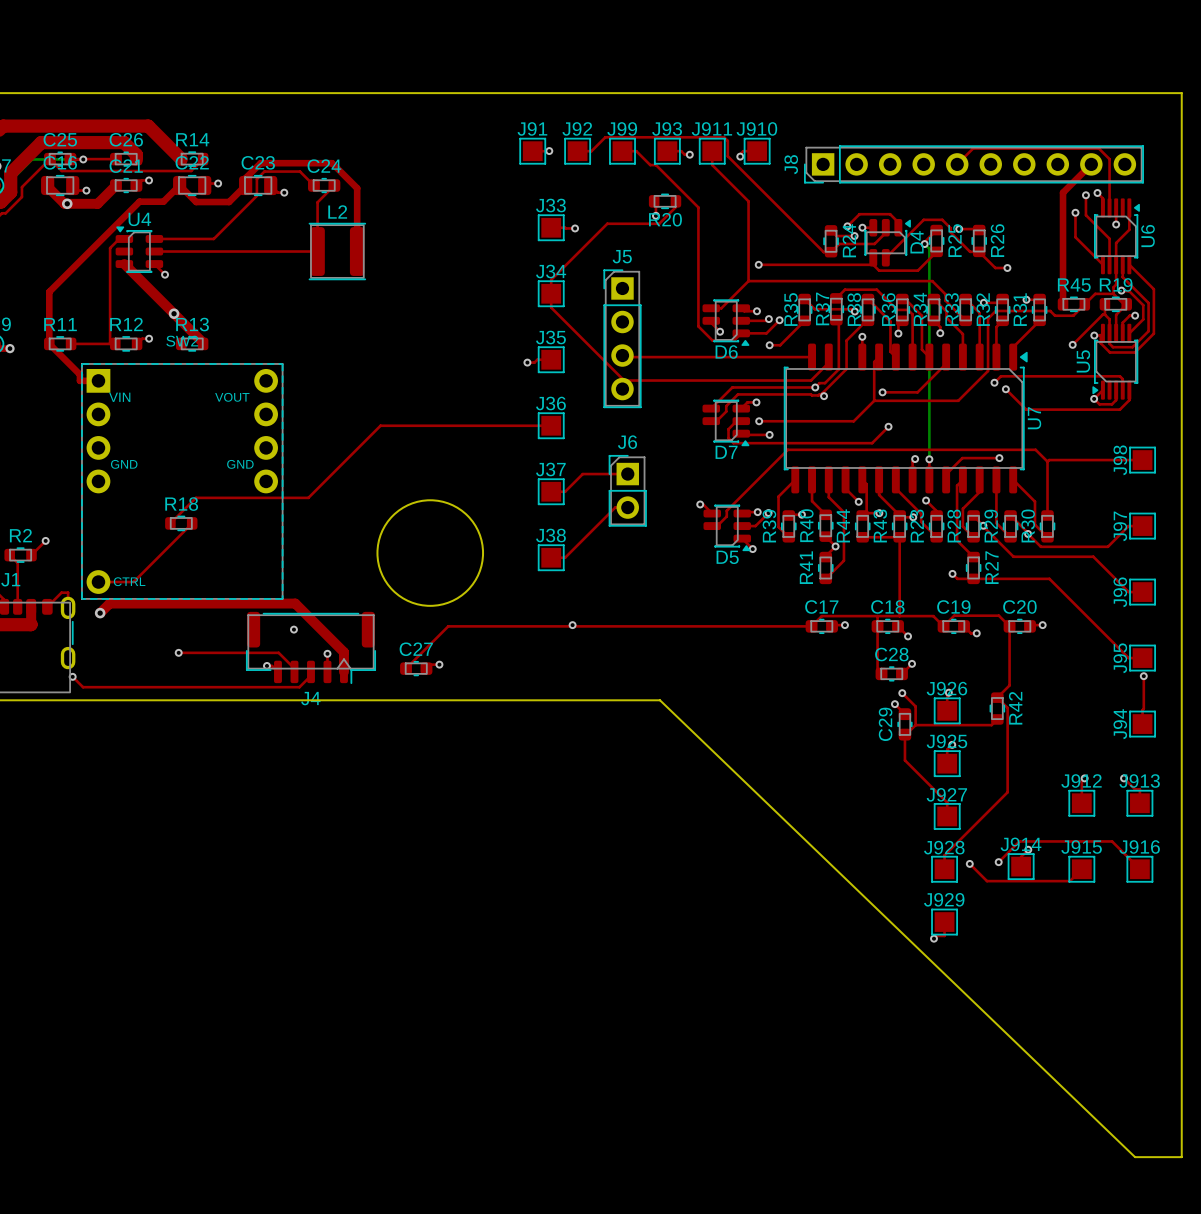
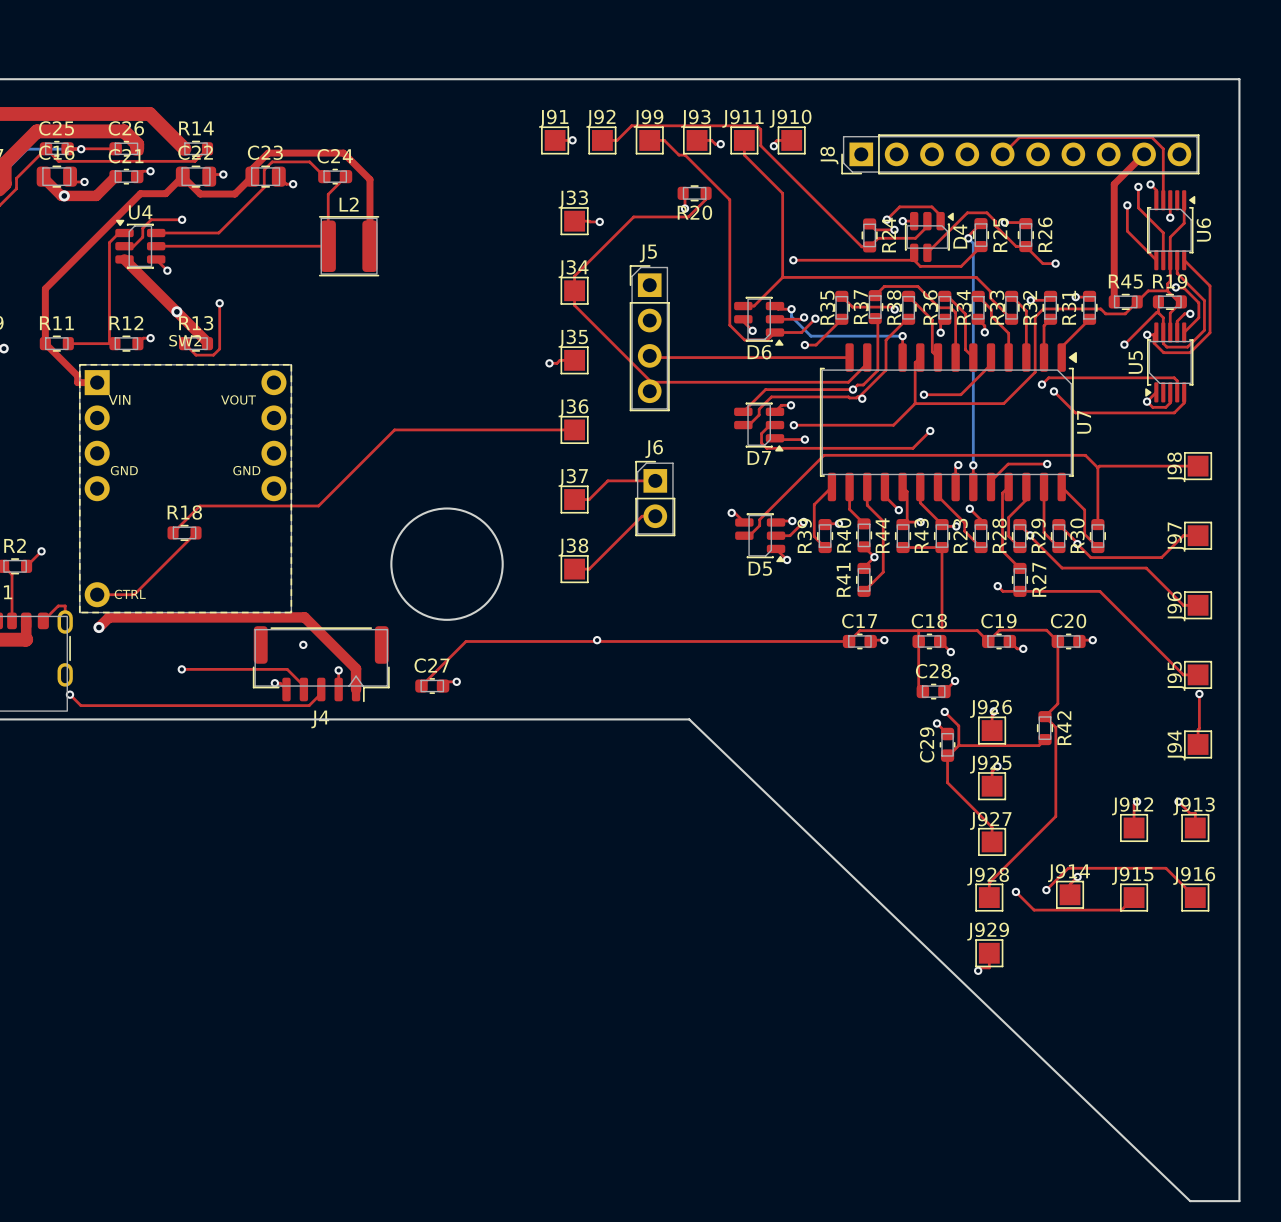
top track: none -> (182, 219) (151, 219) (142, 228) (142, 237) (133, 246) (124, 246)
via: none -> (182, 219)
top track: none -> (219, 303) (219, 348) (213, 355) (196, 355) (184, 343)
via: none -> (219, 303)
bottom track: none -> (791, 309) (791, 316) (810, 336) (902, 336)

